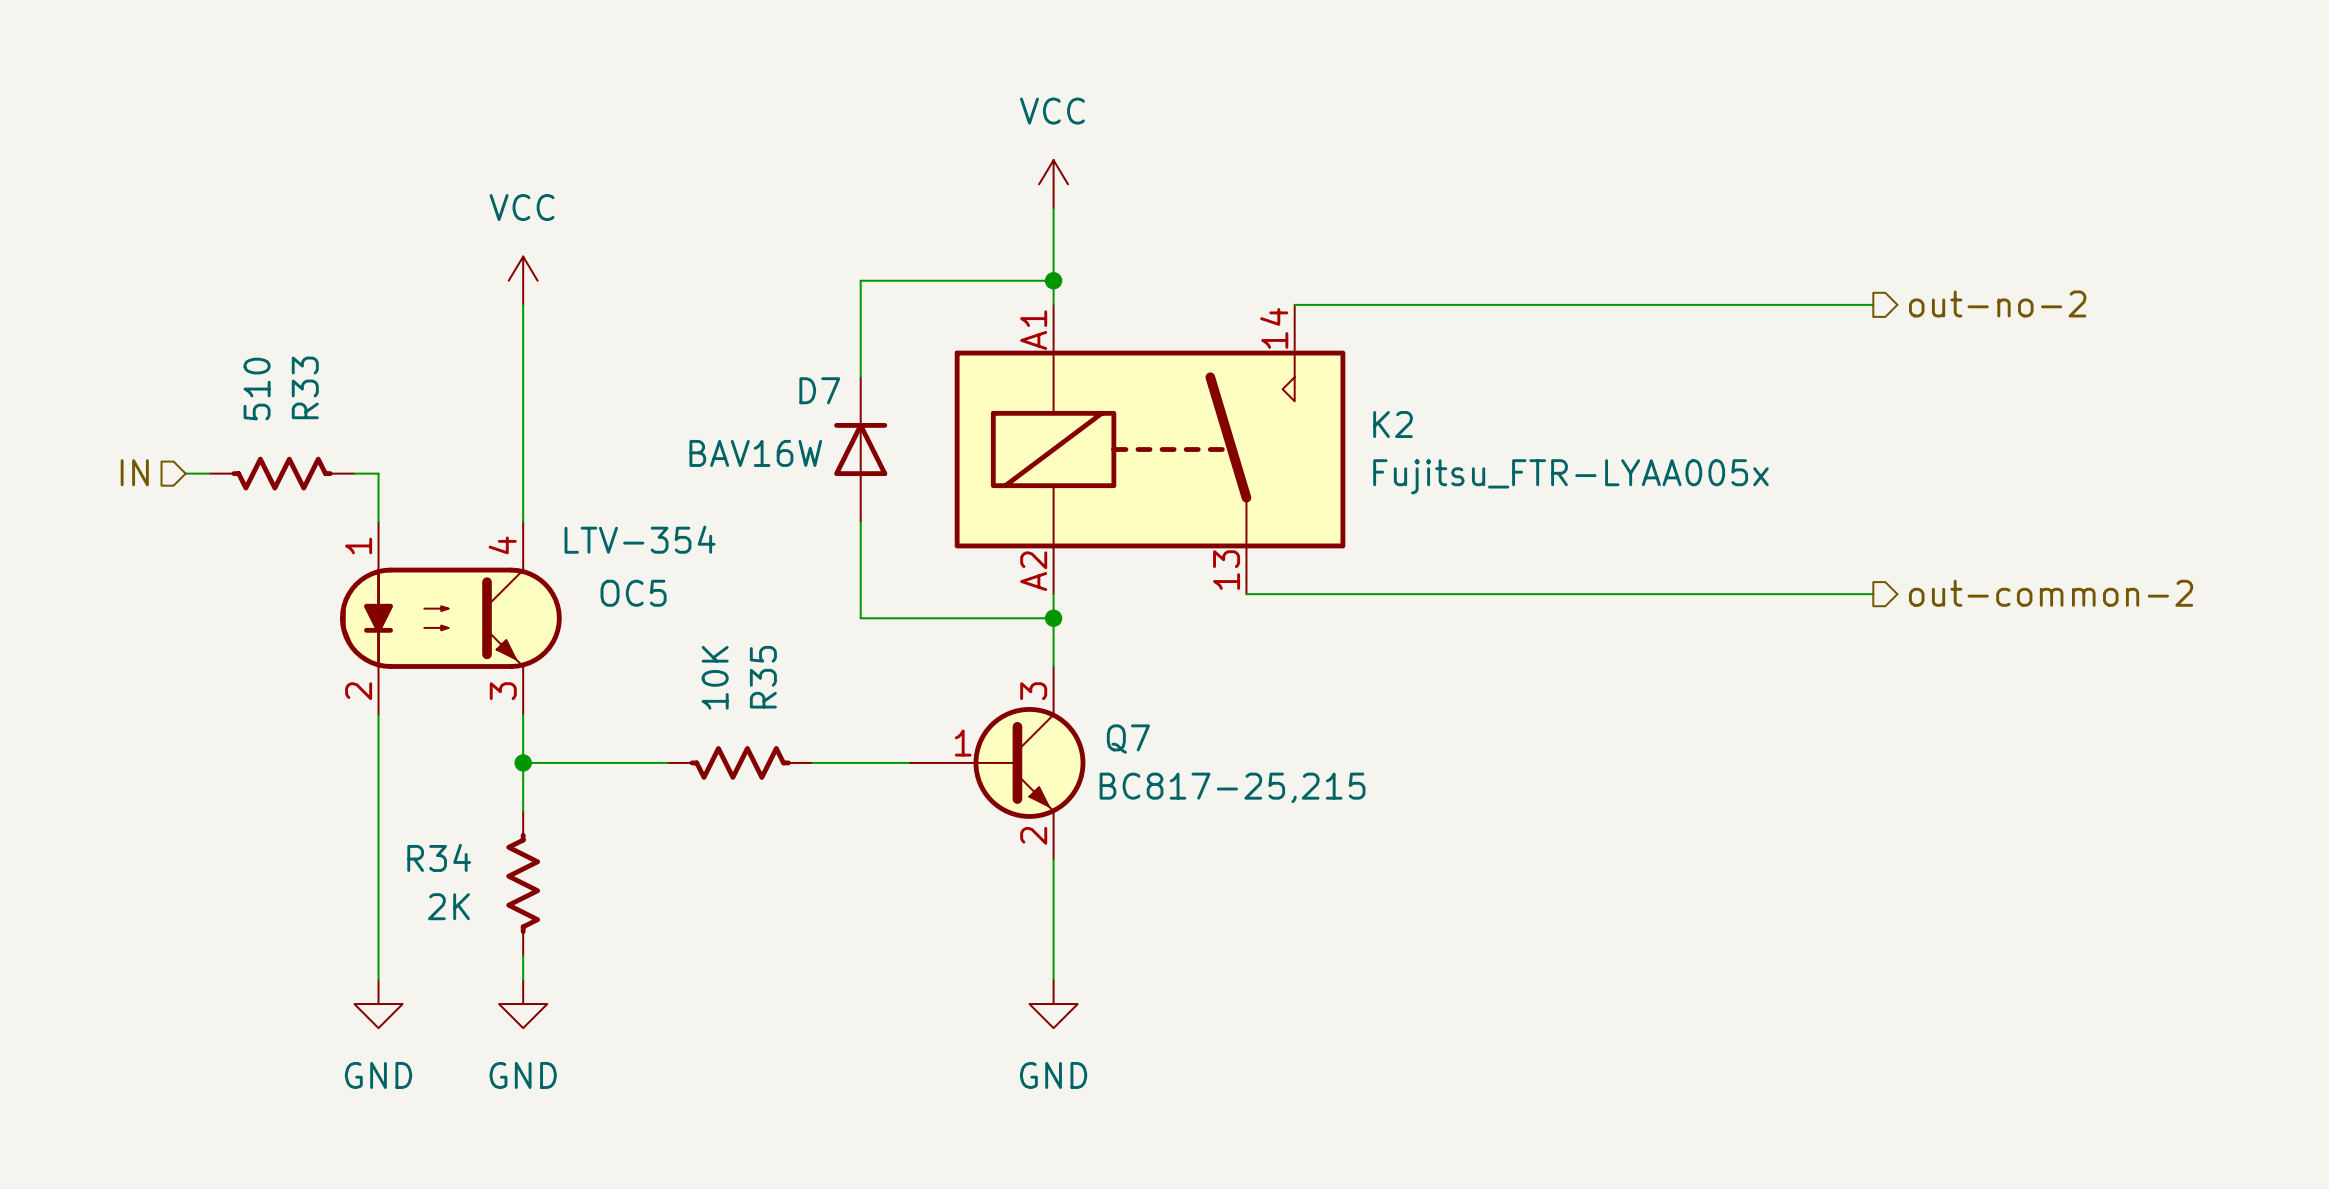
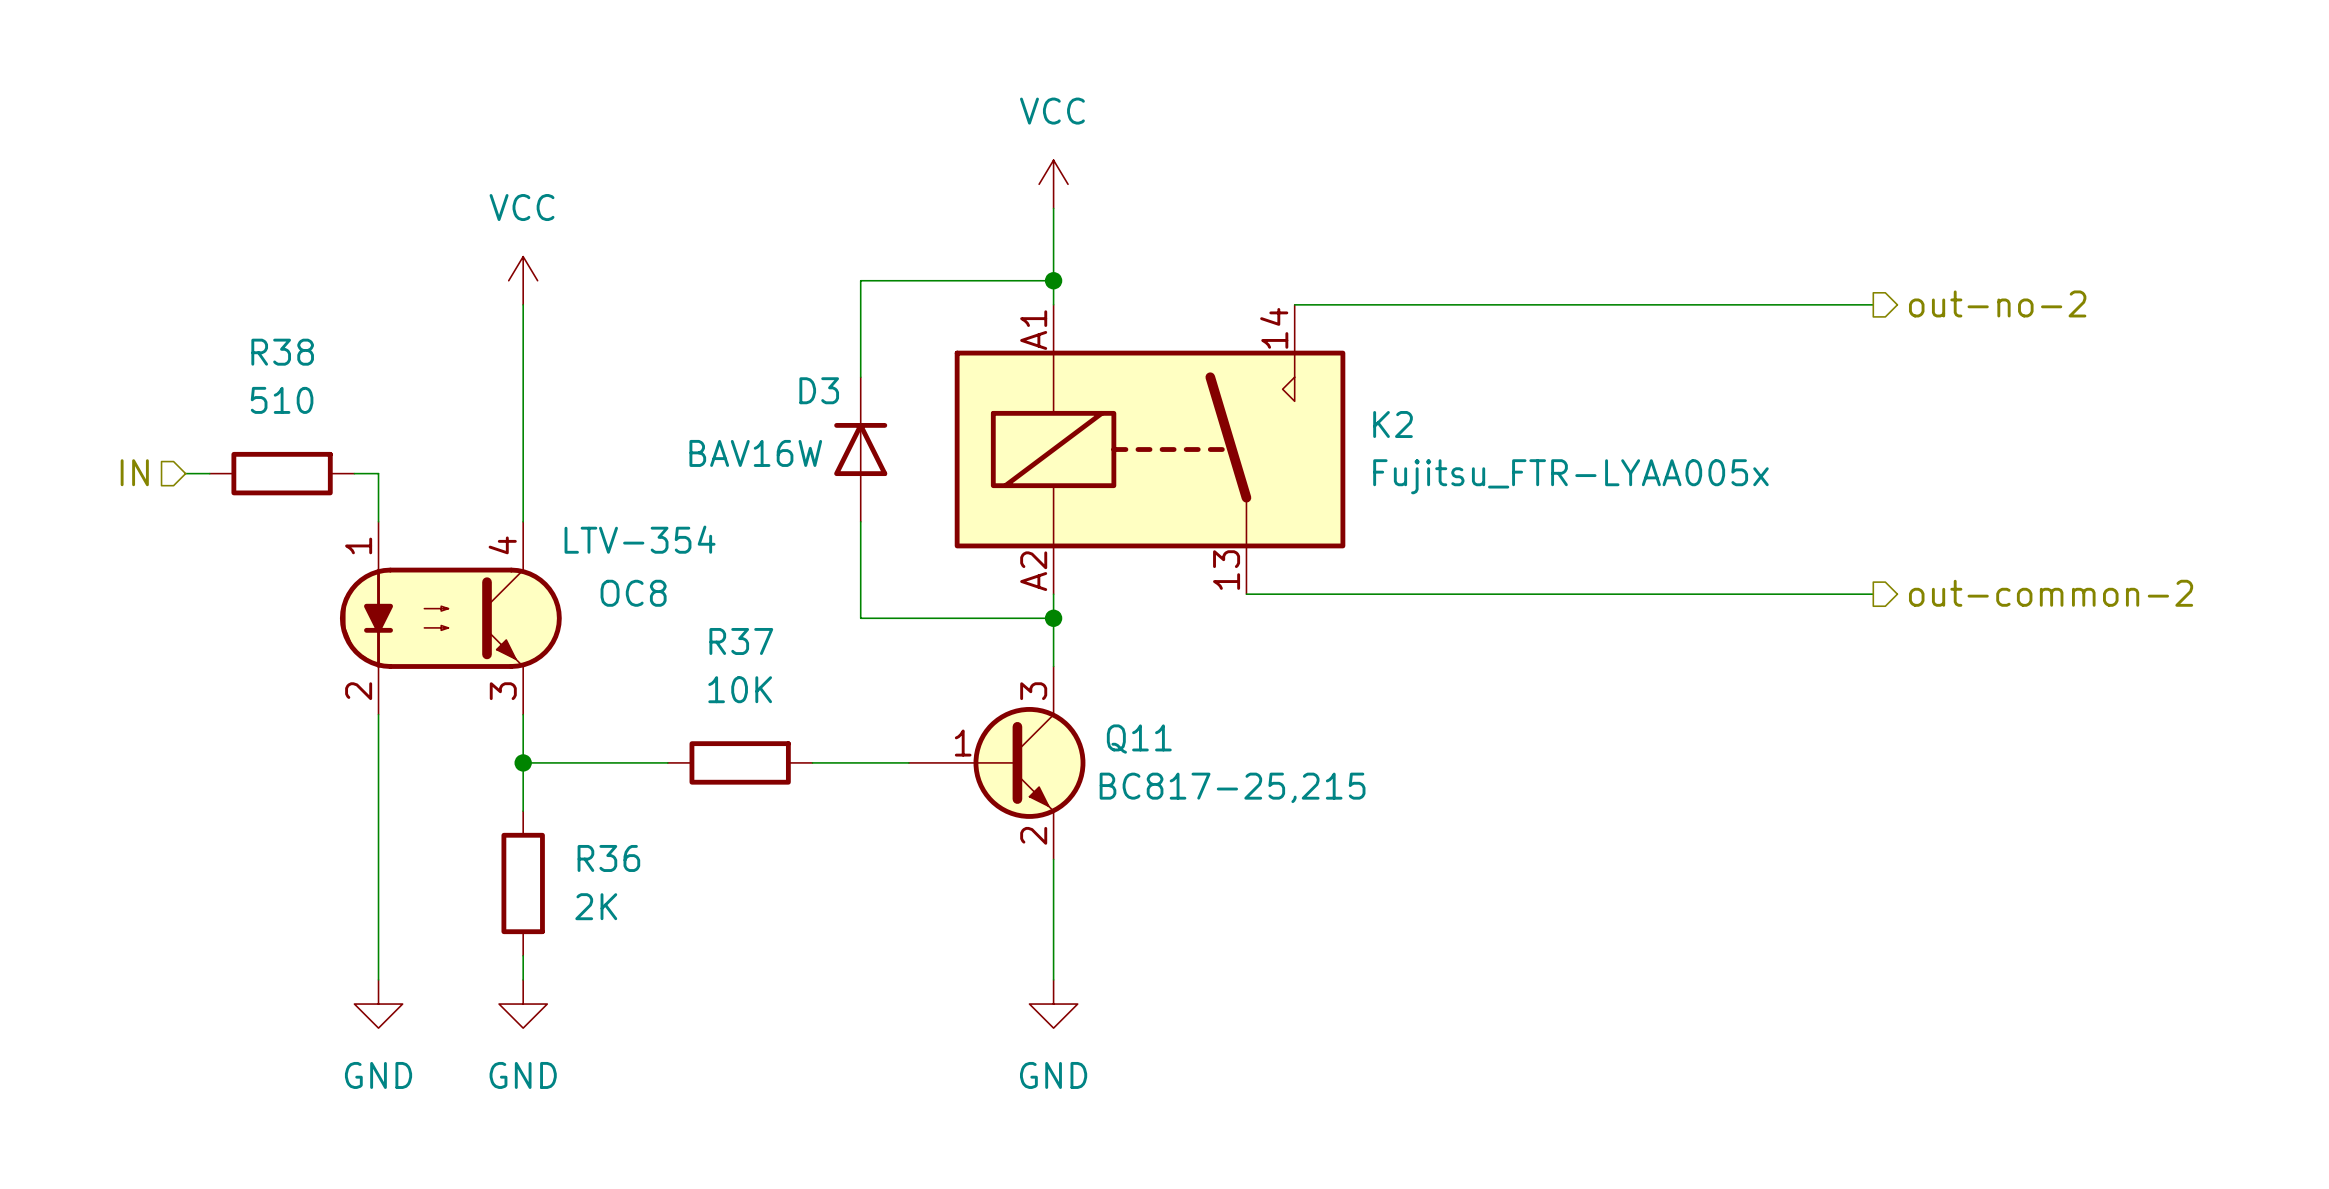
D7 name: D7 (819, 390) -> D3 (819, 390)
R33: 510 (282, 473) -> none
R38: none -> 510 (282, 473)
OC5 name: OC5 (633, 593) -> OC8 (633, 593)
Q7 name: Q7 (1128, 739) -> Q11 (1139, 739)
R35: 10K (740, 762) -> none
R37: none -> 10K (740, 762)
R34: 2K (523, 883) -> none
R36: none -> 2K (523, 883)

